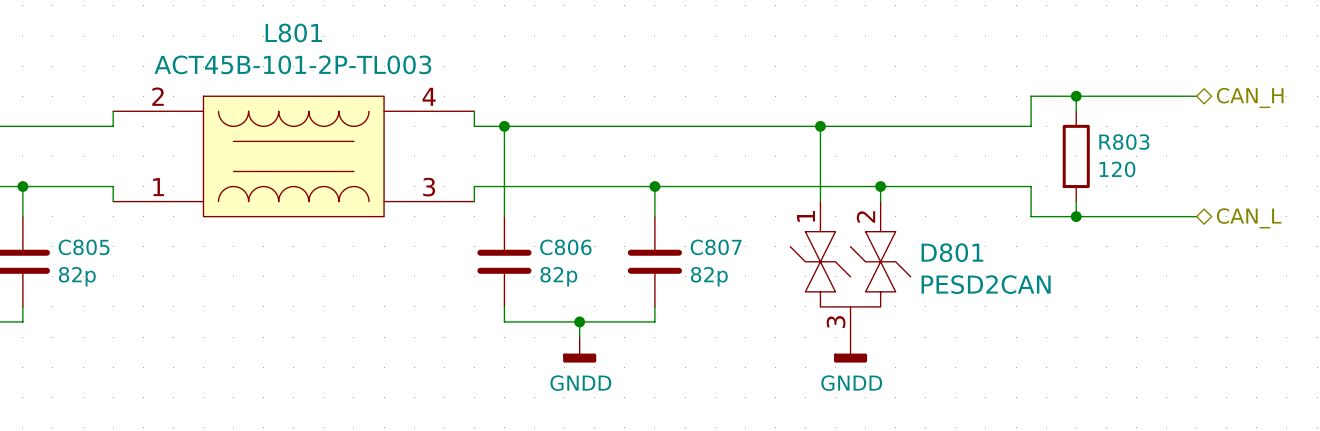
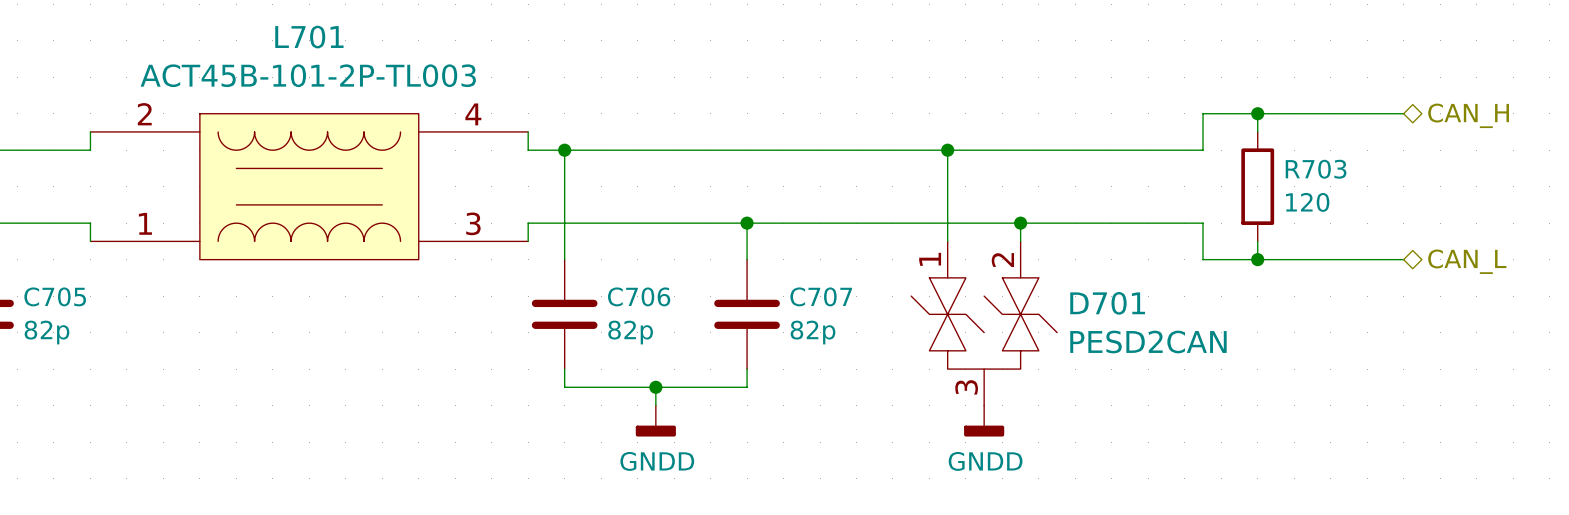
L801 name: L801 (293, 32) -> L701 (309, 37)
R803 name: R803 (1124, 142) -> R703 (1316, 169)
C805 name: C805 (84, 247) -> C705 (55, 296)
C806 name: C806 (565, 247) -> C706 (639, 296)
C807 name: C807 (716, 247) -> C707 (821, 296)
D801 name: D801 (952, 252) -> D701 (1107, 303)

